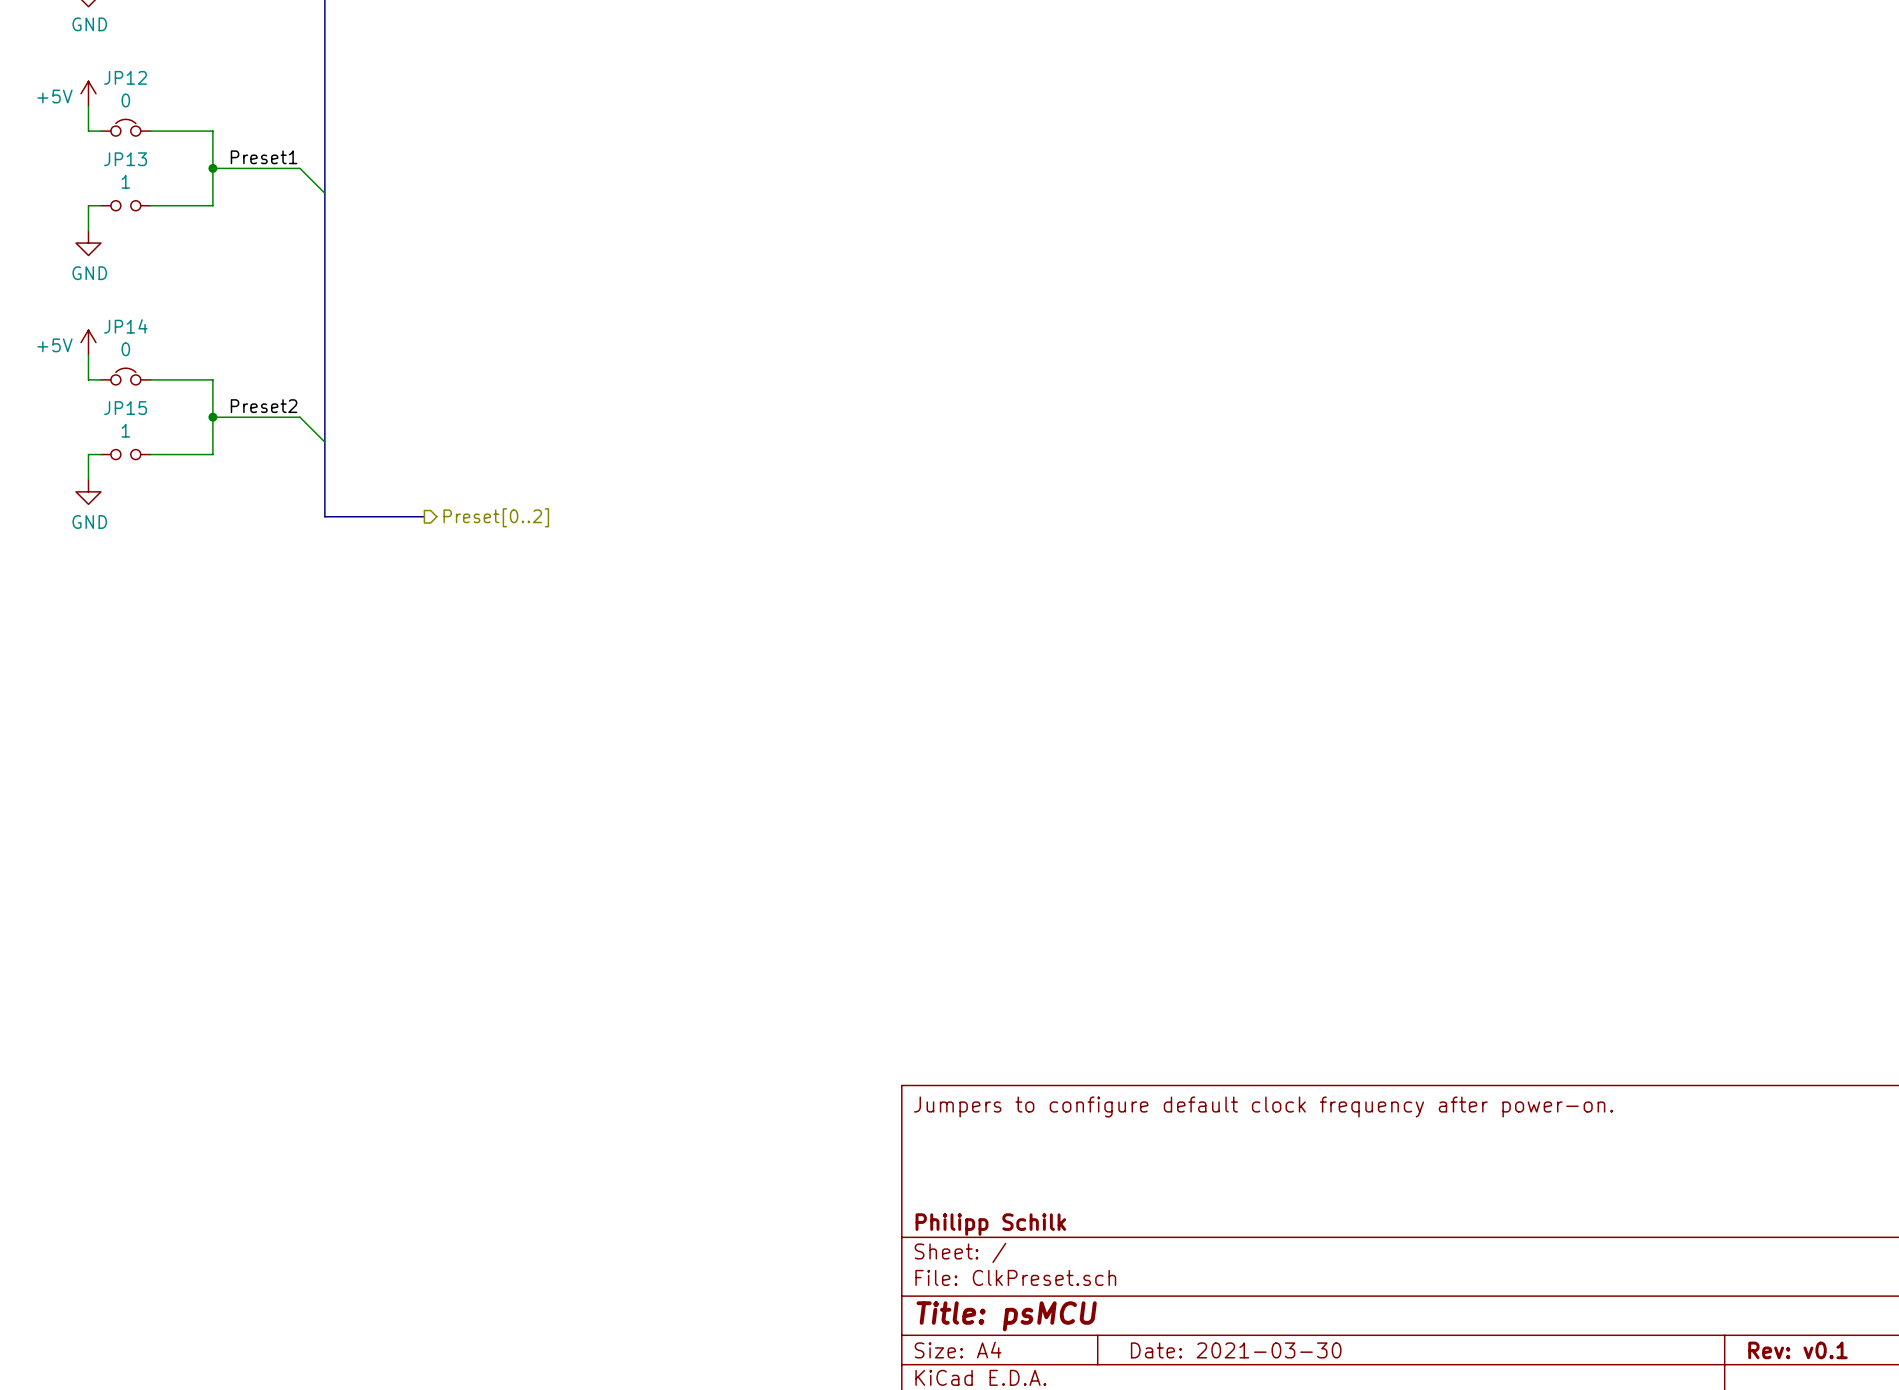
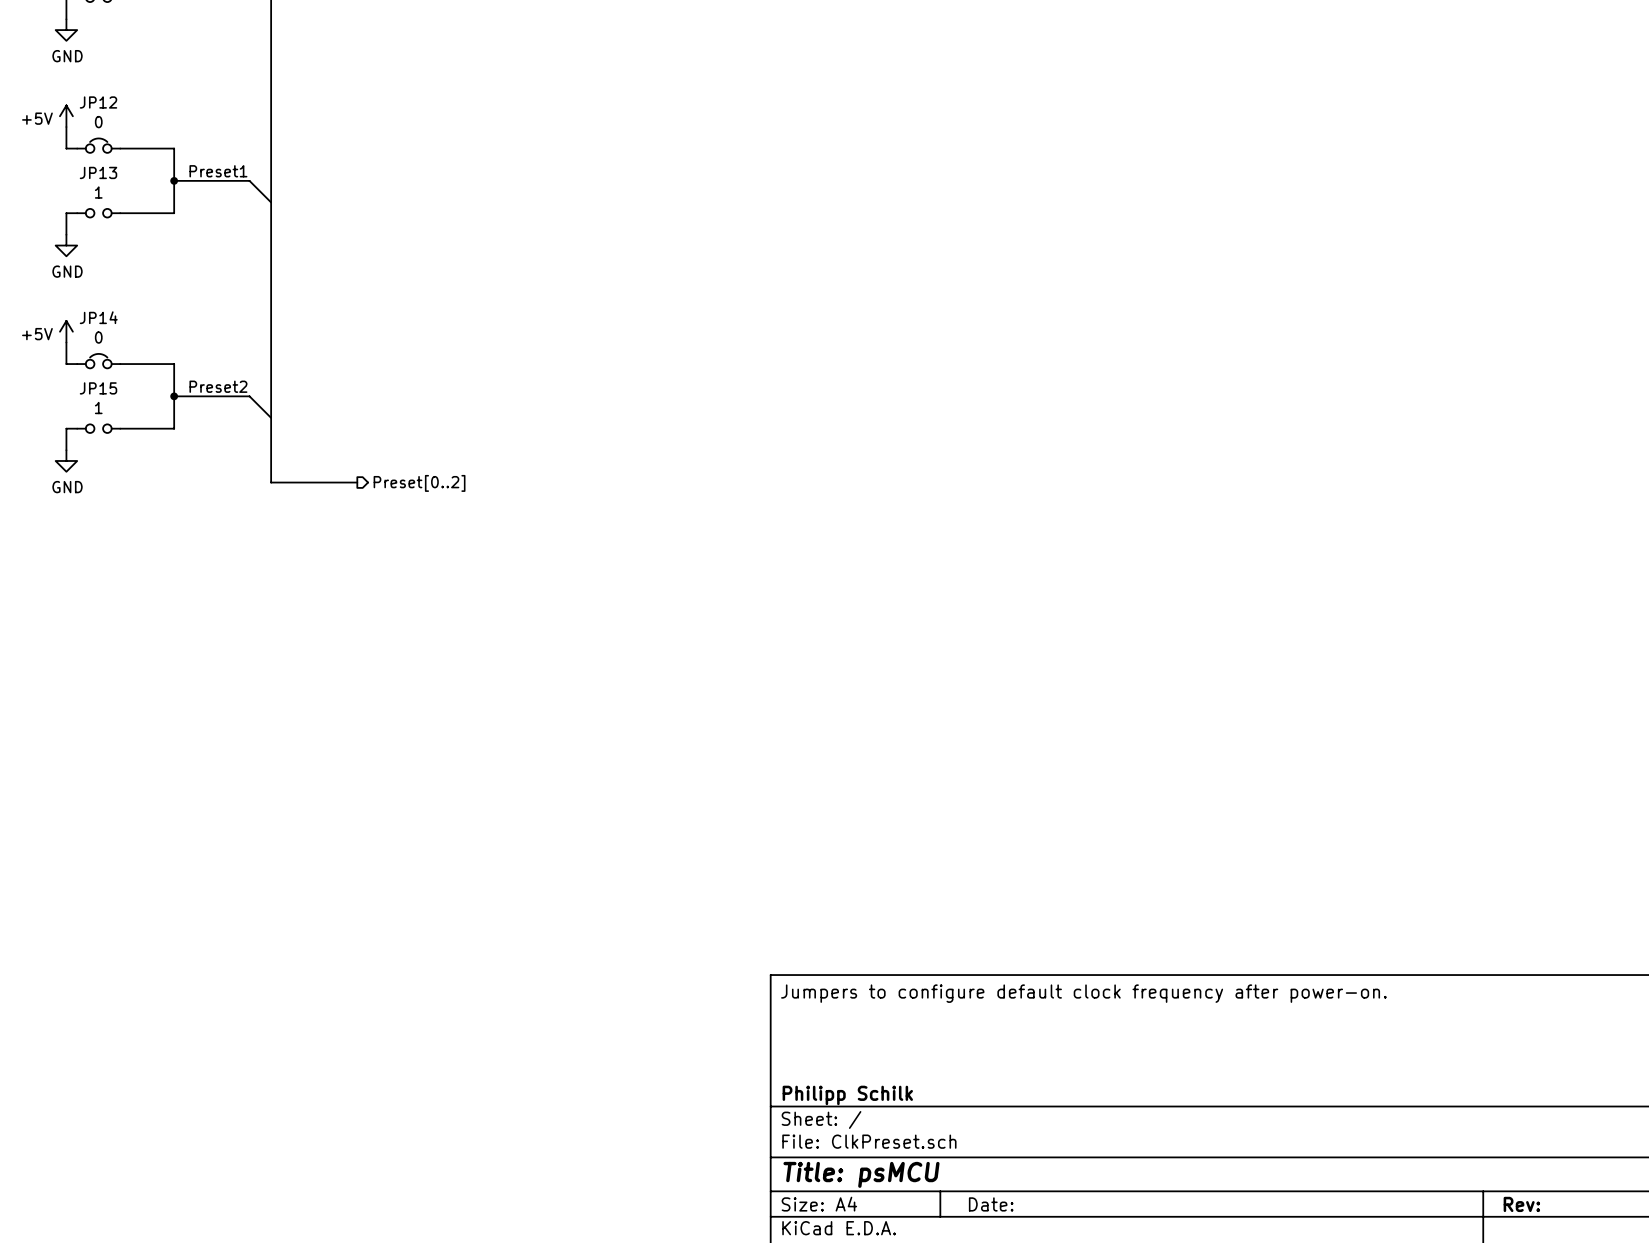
title block: Date: 2021-03-30 (1236, 1350) -> Date: (991, 1204)
title block: Rev: v0.1 (1797, 1350) -> Rev: (1521, 1204)

